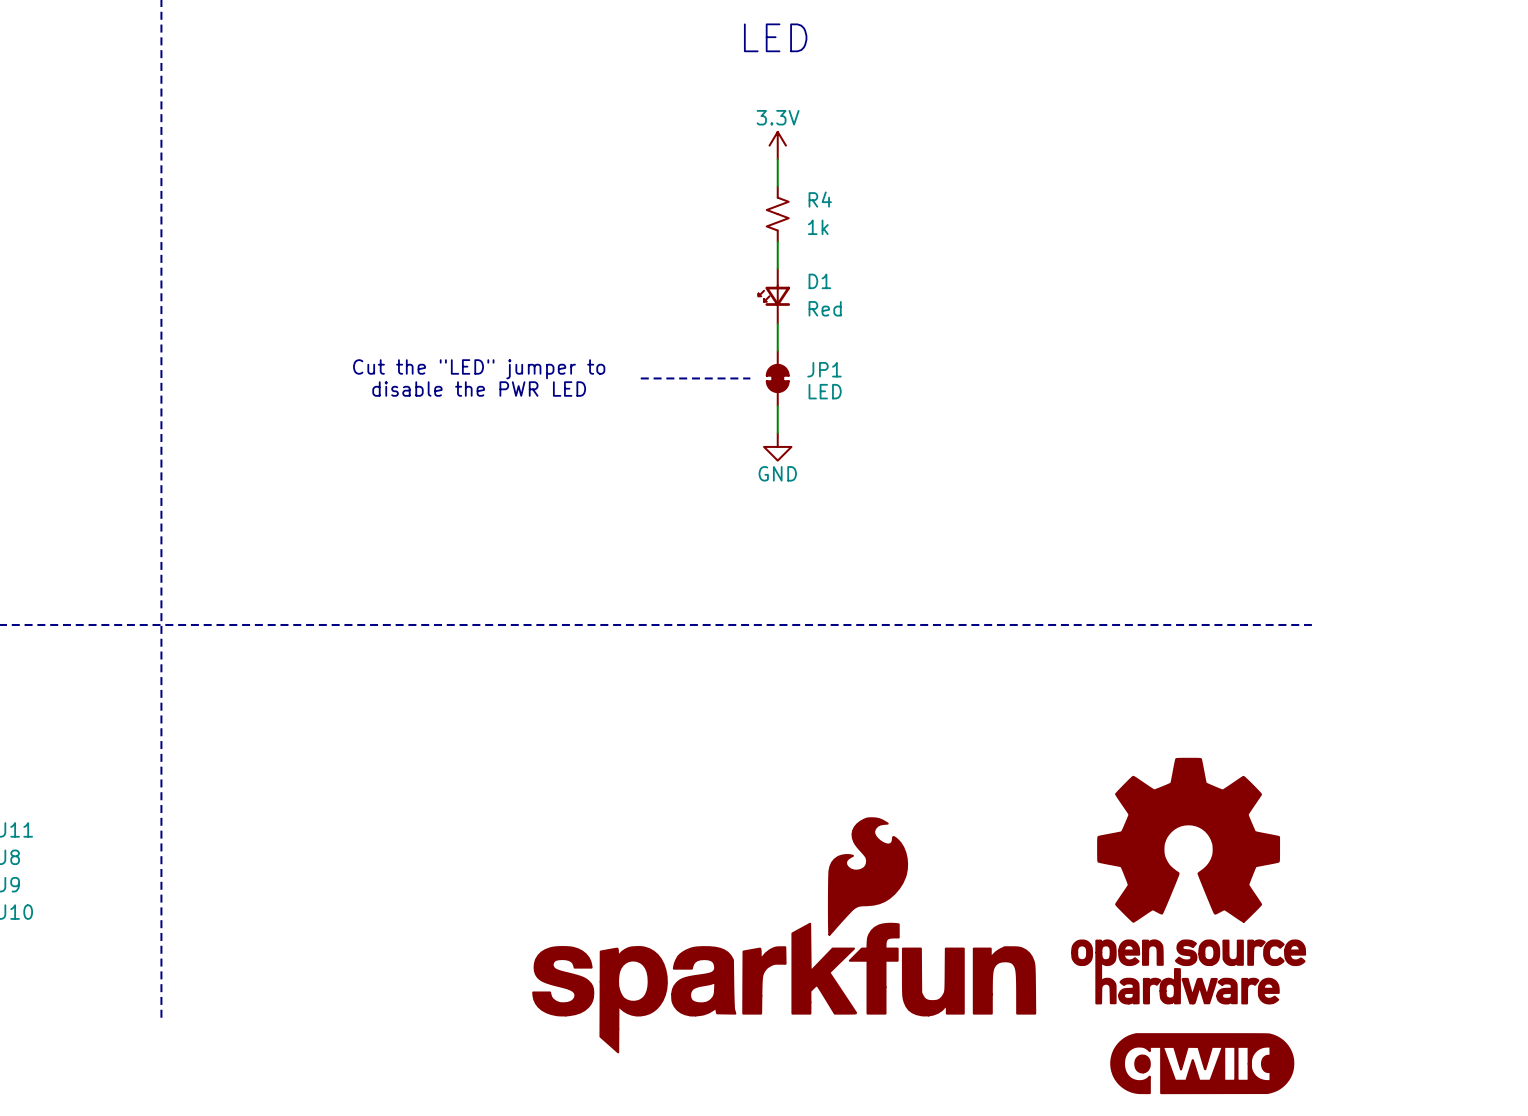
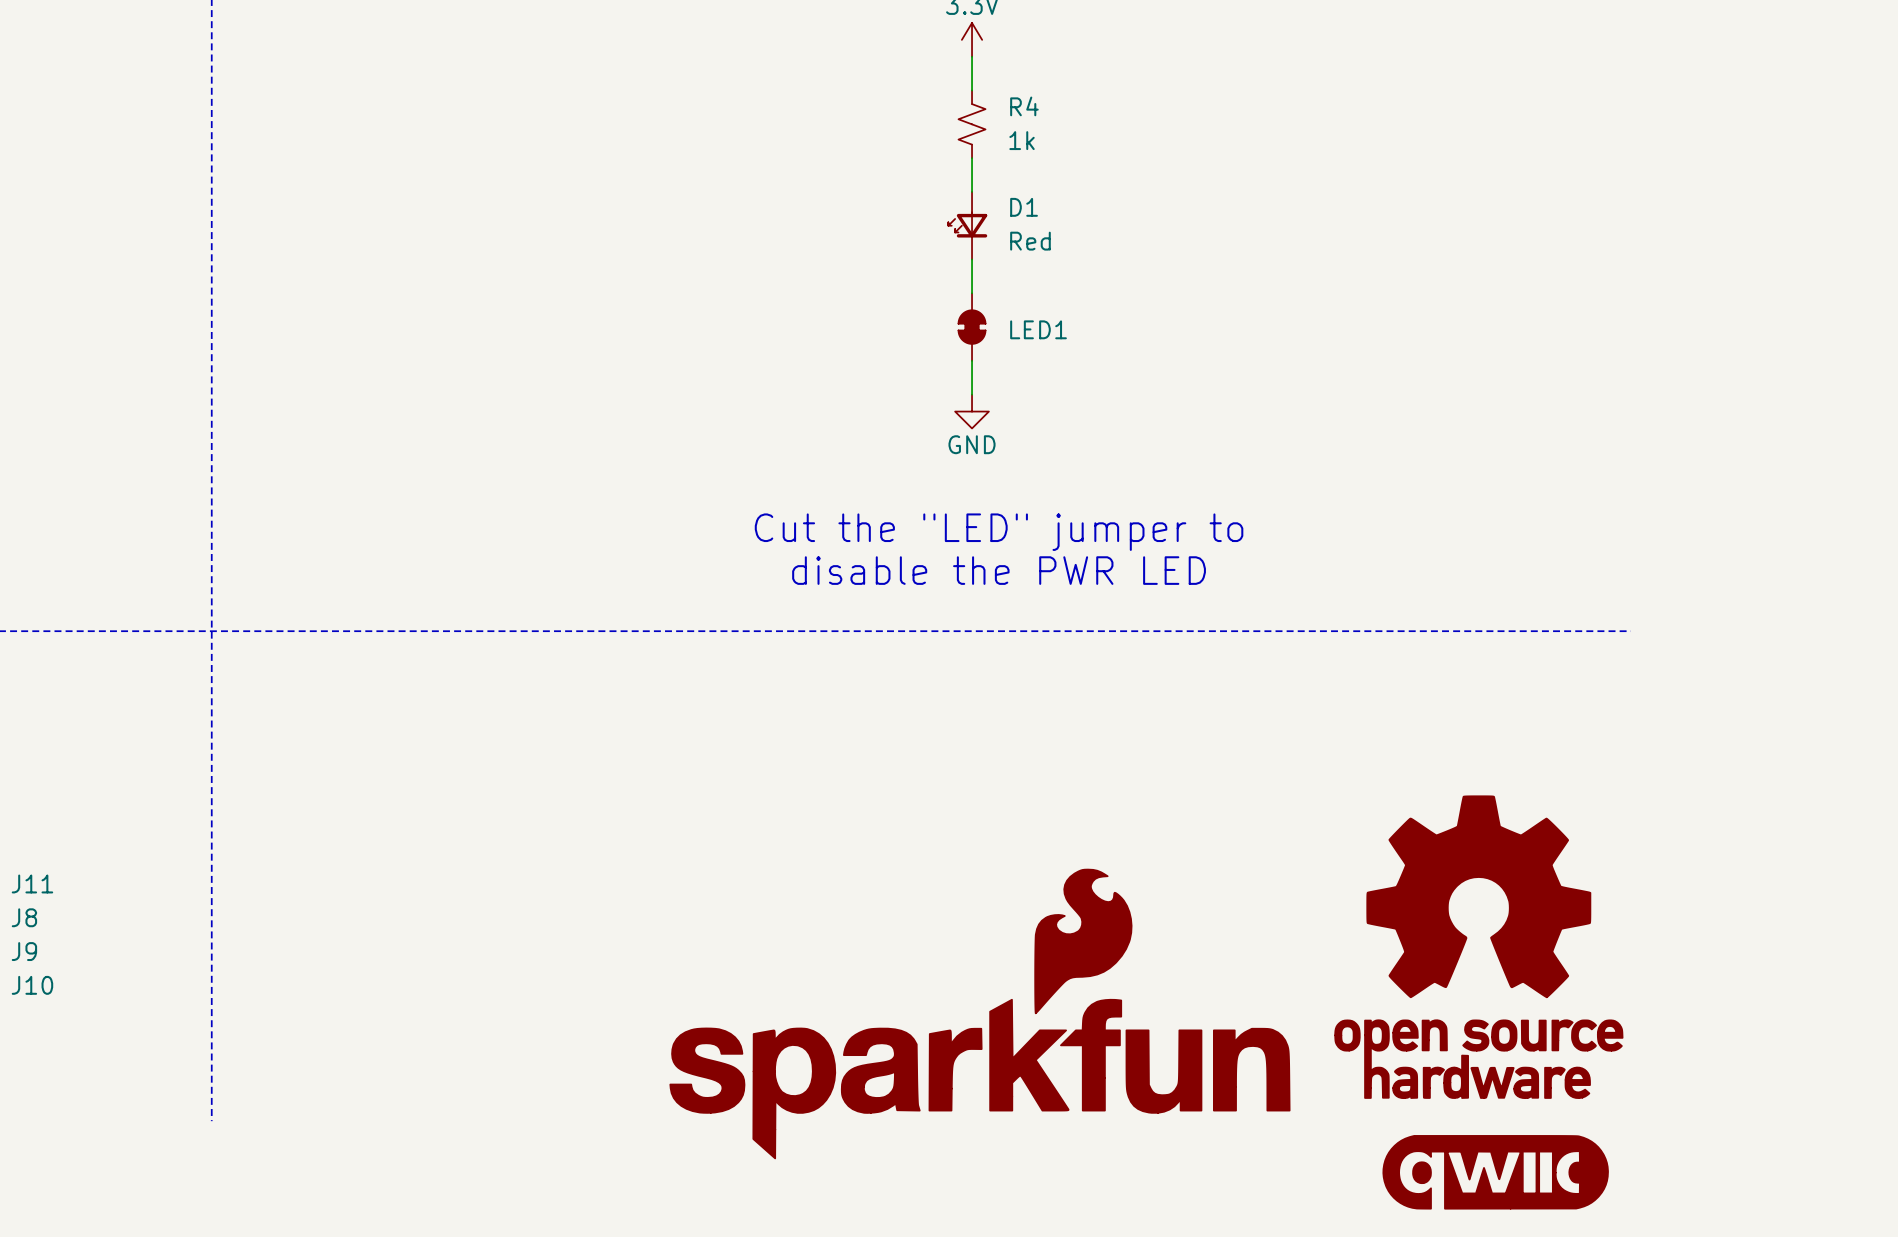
text: Cut the "LED" jumper to (479, 369) -> none
JP1 name: JP1 (824, 369) -> LED1 (1038, 329)
line: (640, 378) (750, 378) -> none
text: disable the PWR LED (479, 389) -> none
JP1 value: LED (825, 391) -> none
text: none -> Cut the "LED" jumper to (999, 532)
text: none -> disable the PWR LED (999, 570)

